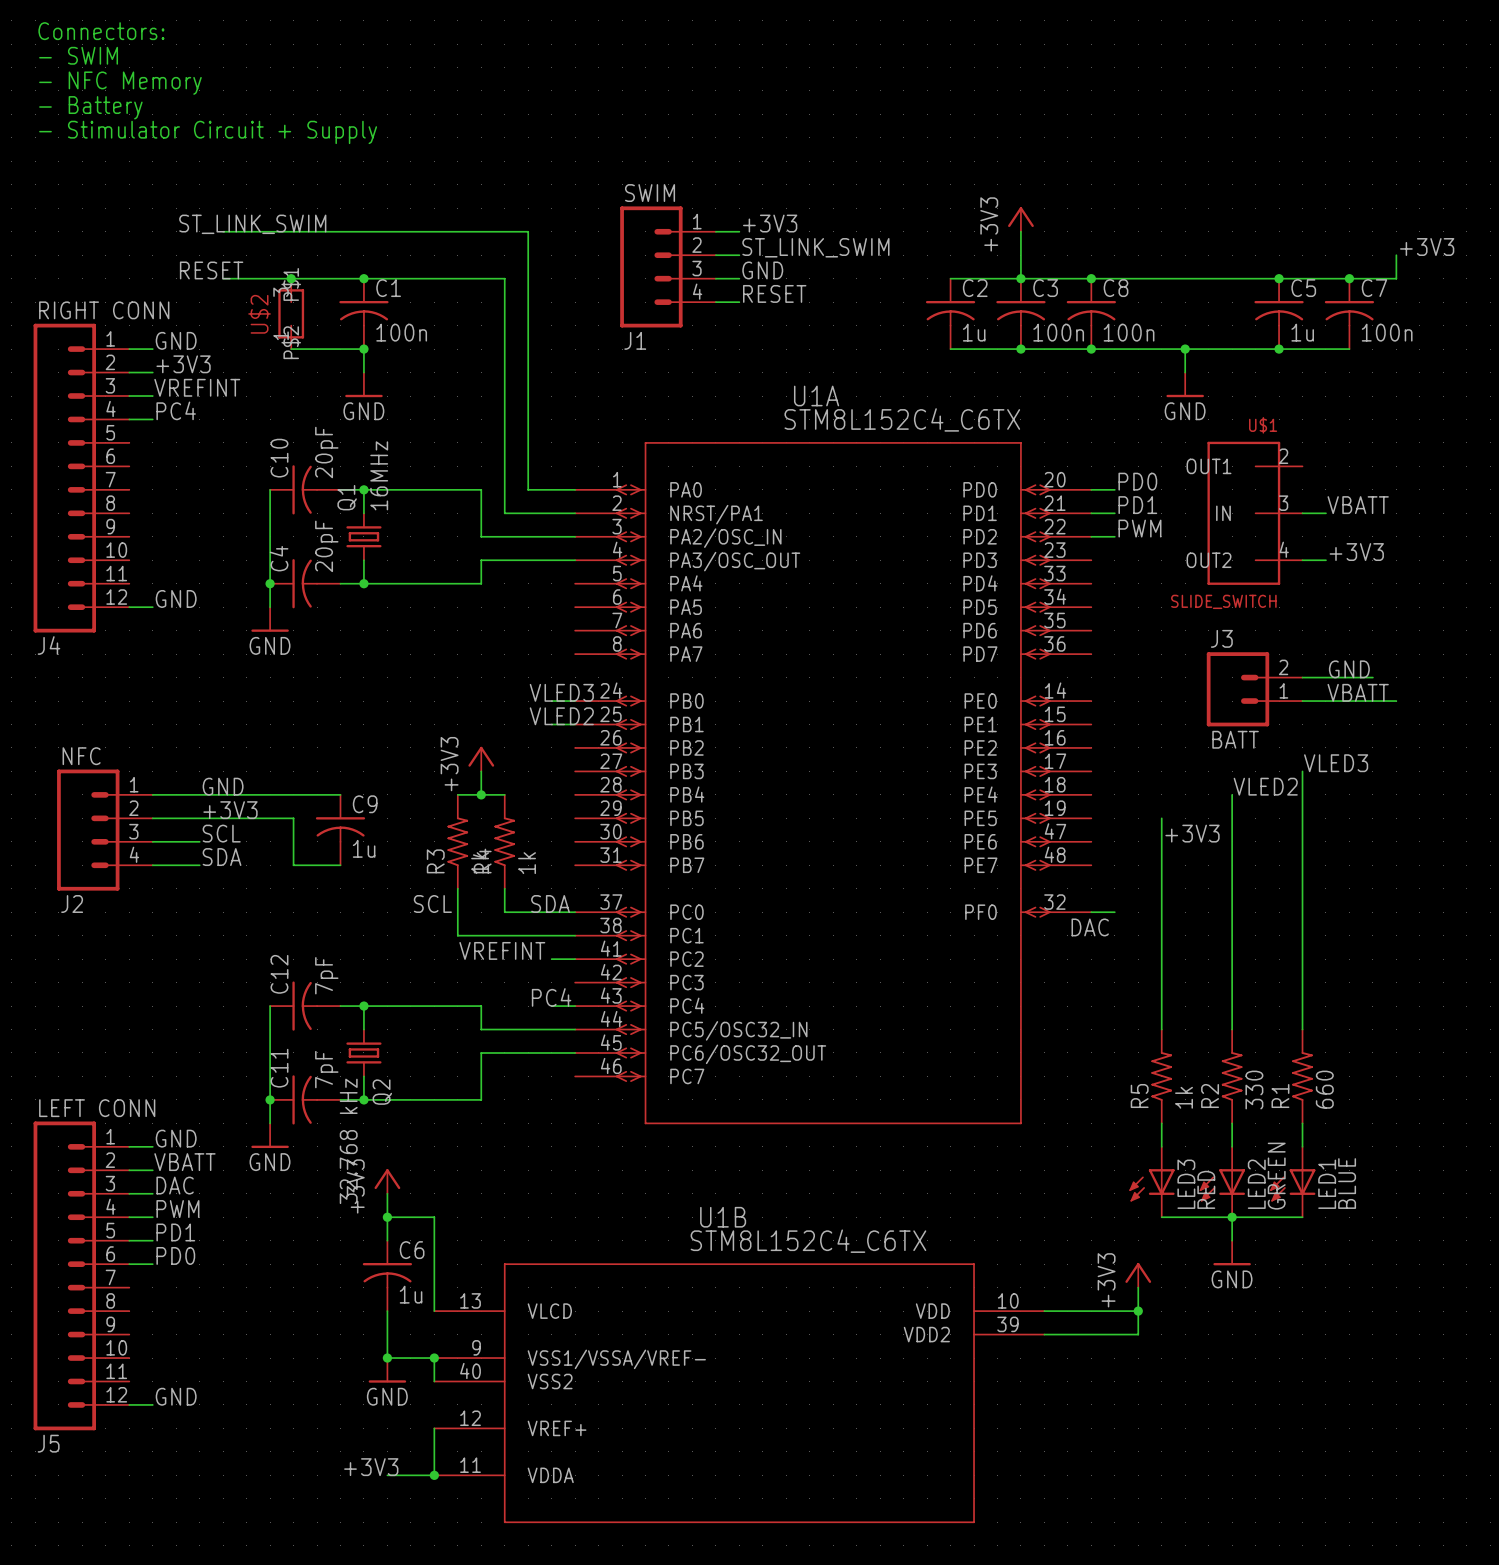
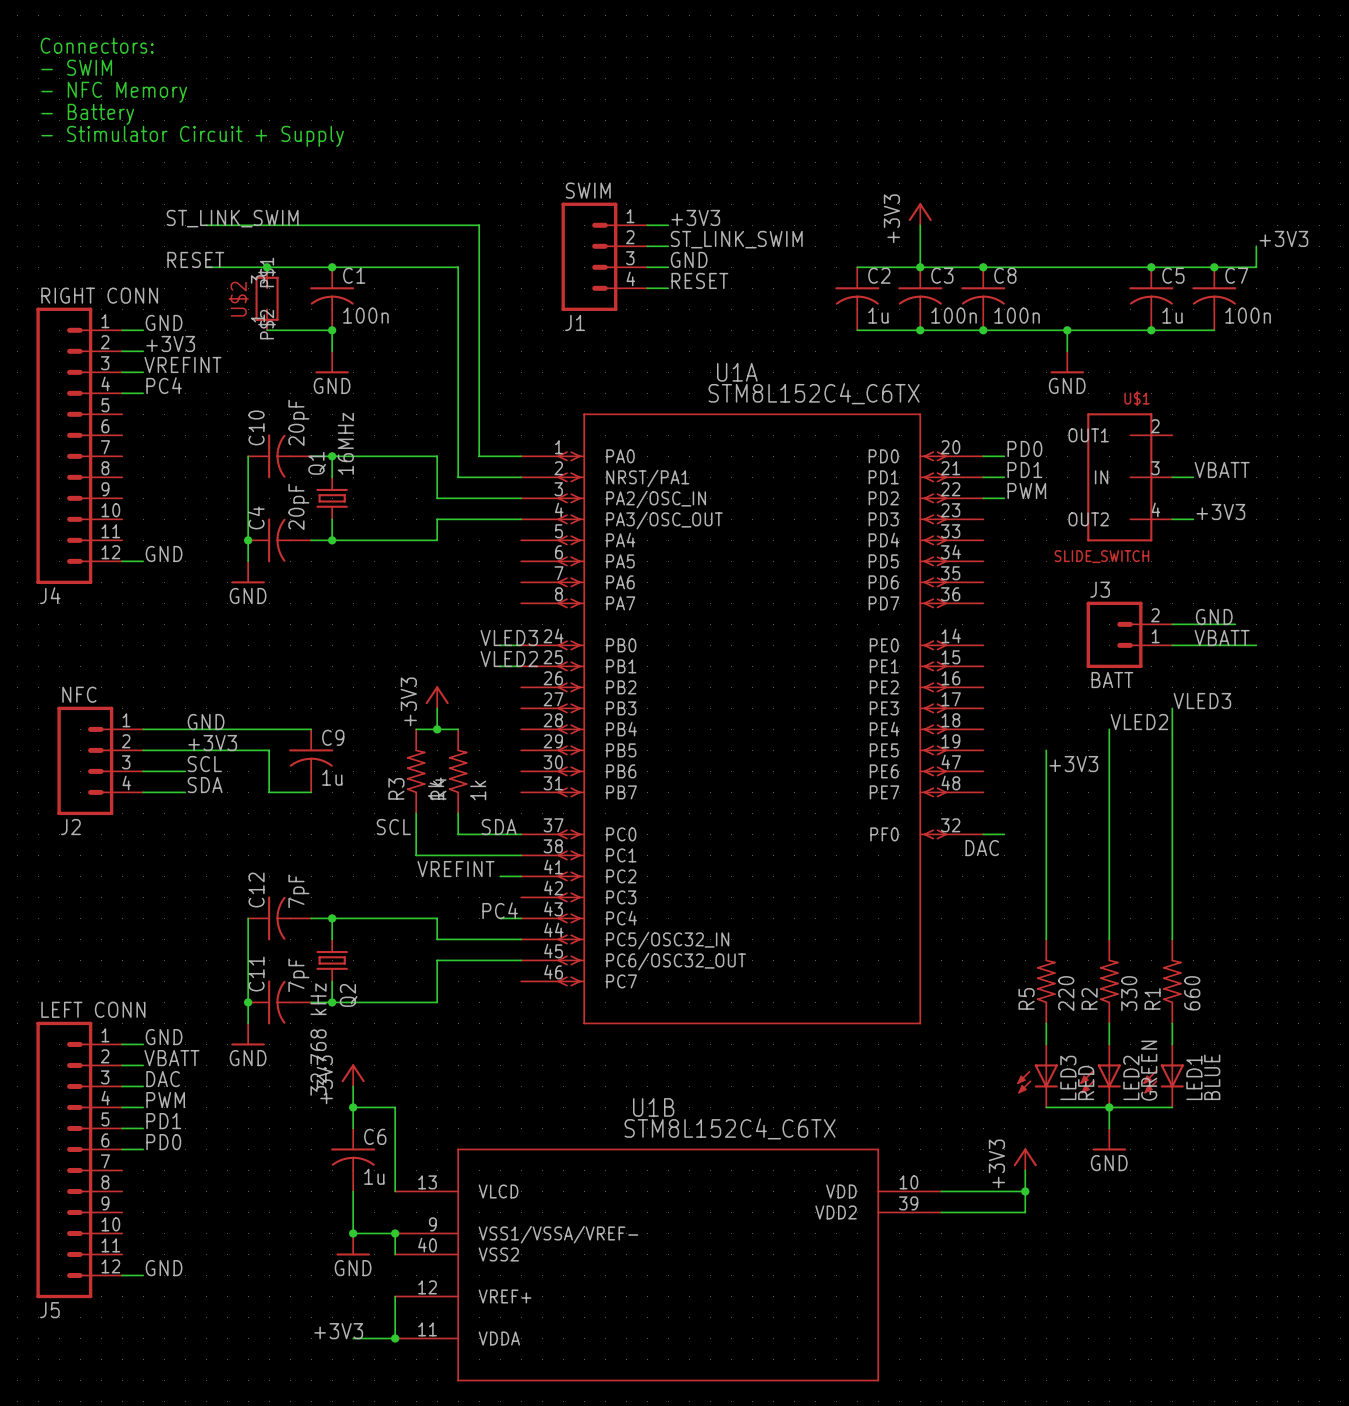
R5 value: 1k (1184, 1097) -> 220 (1066, 993)

